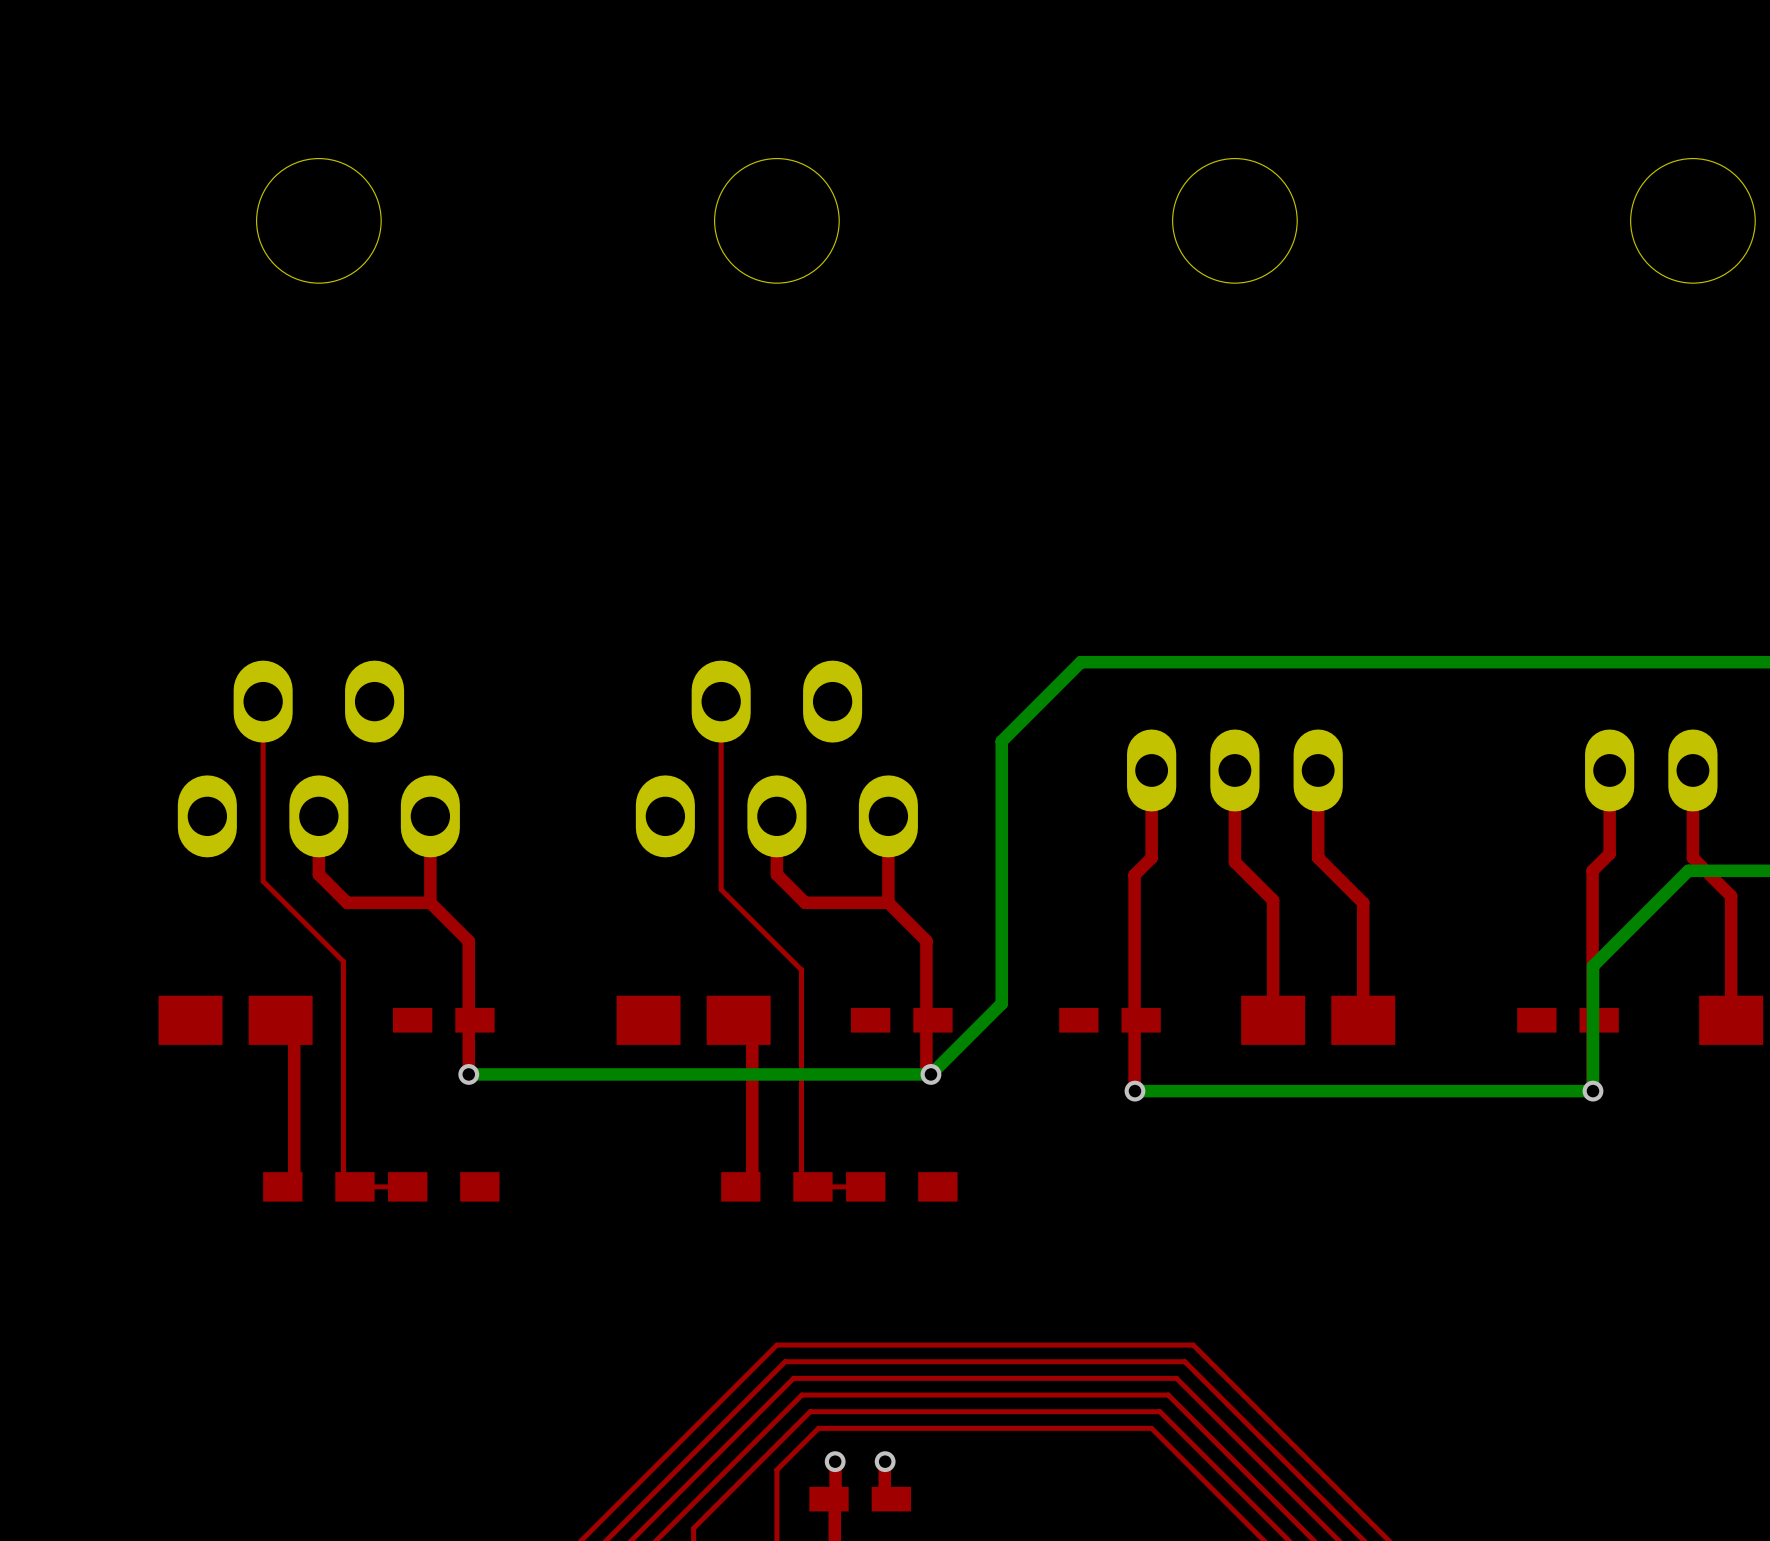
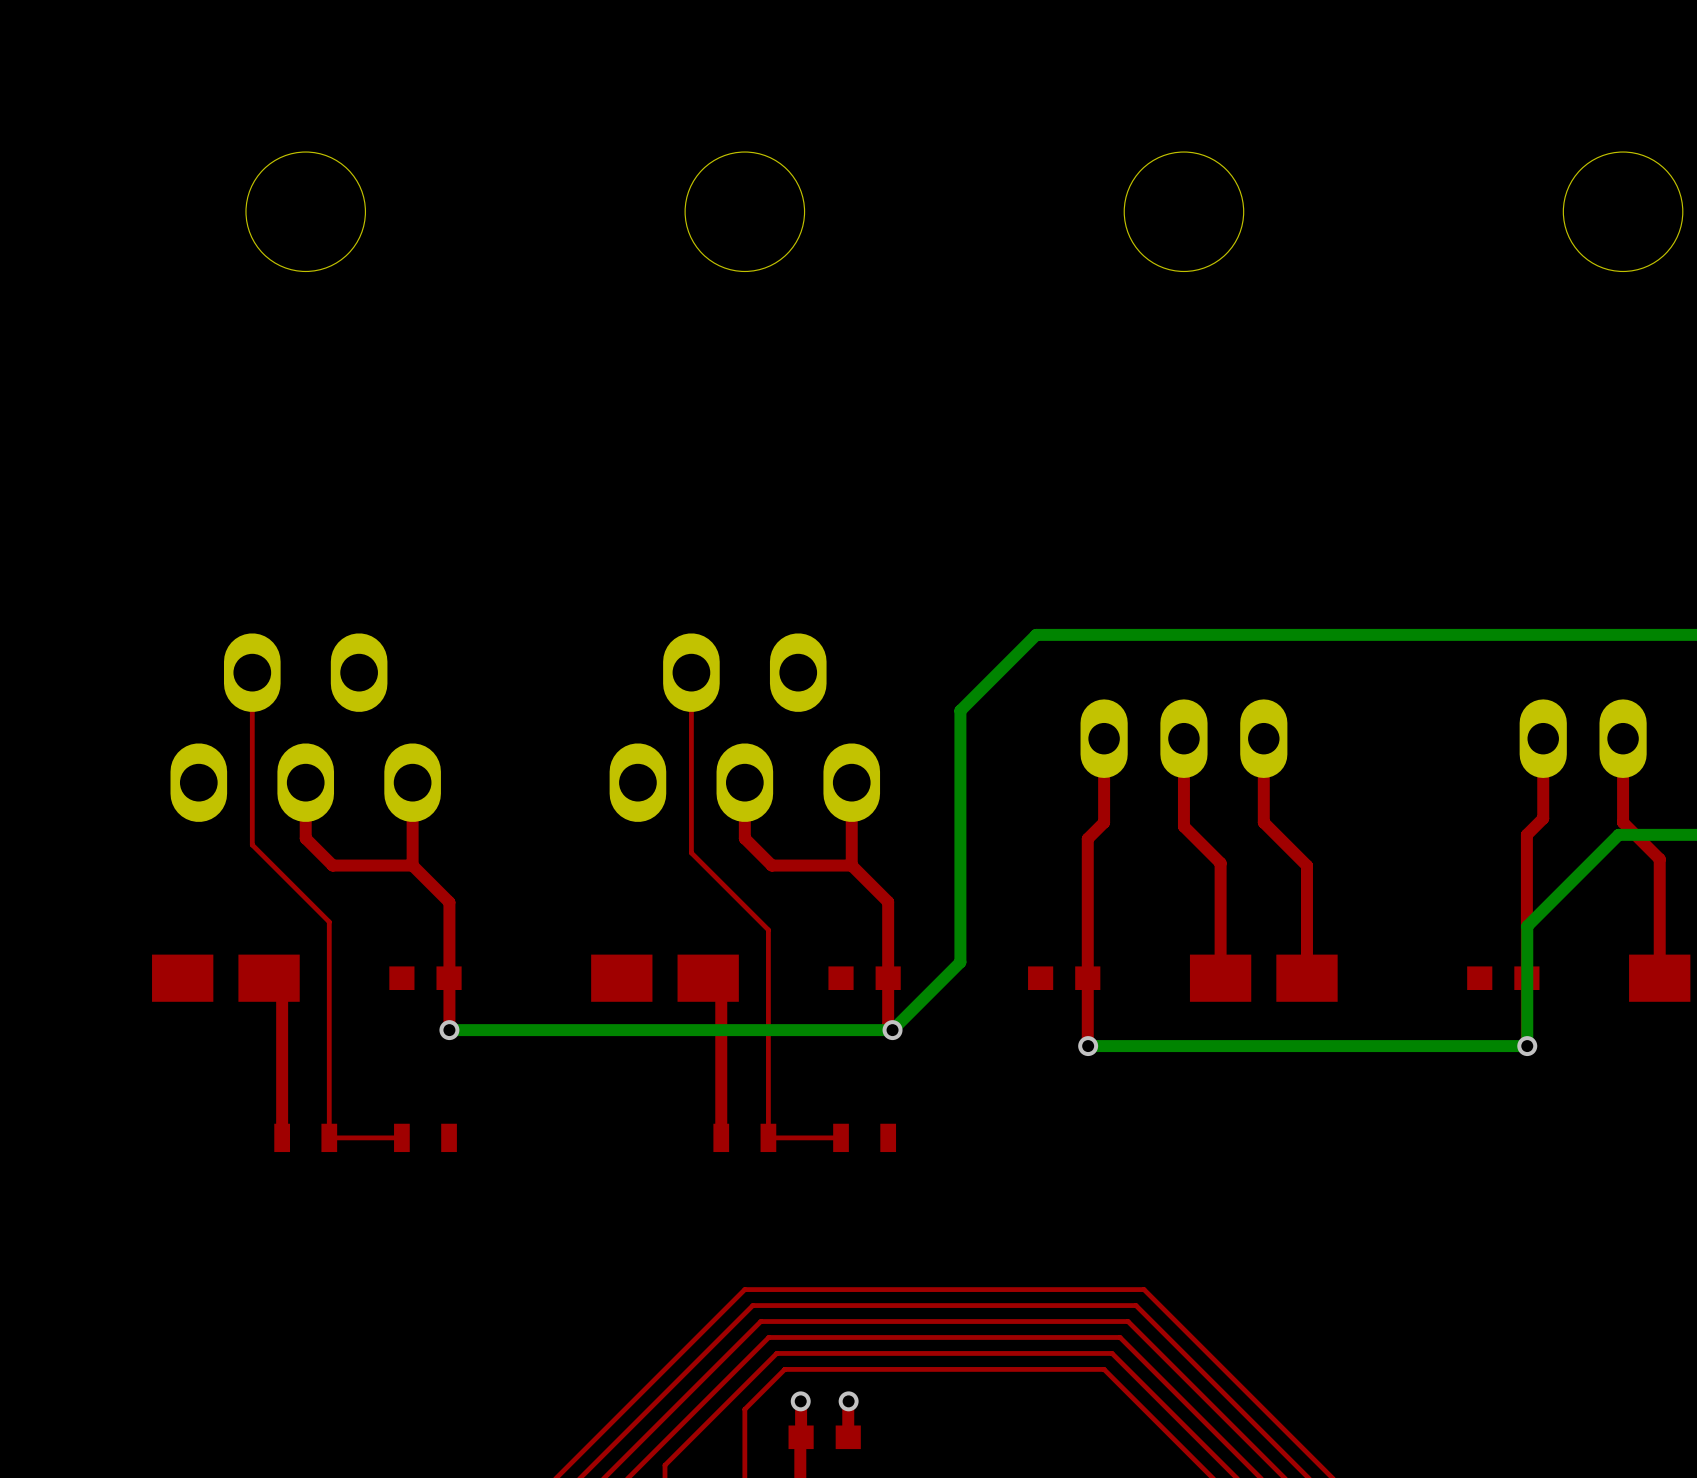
part footprint: [392, 1008, 495, 1033] -> [389, 966, 462, 990]
part footprint: [850, 1008, 953, 1033] -> [828, 966, 901, 990]
part footprint: [1059, 1008, 1161, 1033] -> [1028, 966, 1101, 990]
part footprint: [1517, 1008, 1619, 1033] -> [1467, 966, 1540, 990]
part footprint: [263, 1172, 375, 1202] -> [274, 1123, 338, 1153]
part footprint: [388, 1172, 500, 1202] -> [394, 1123, 457, 1153]
part footprint: [721, 1172, 833, 1202] -> [713, 1123, 777, 1153]
part footprint: [846, 1172, 958, 1202] -> [833, 1123, 897, 1153]
part footprint: [809, 1486, 911, 1512] -> [788, 1425, 861, 1450]

